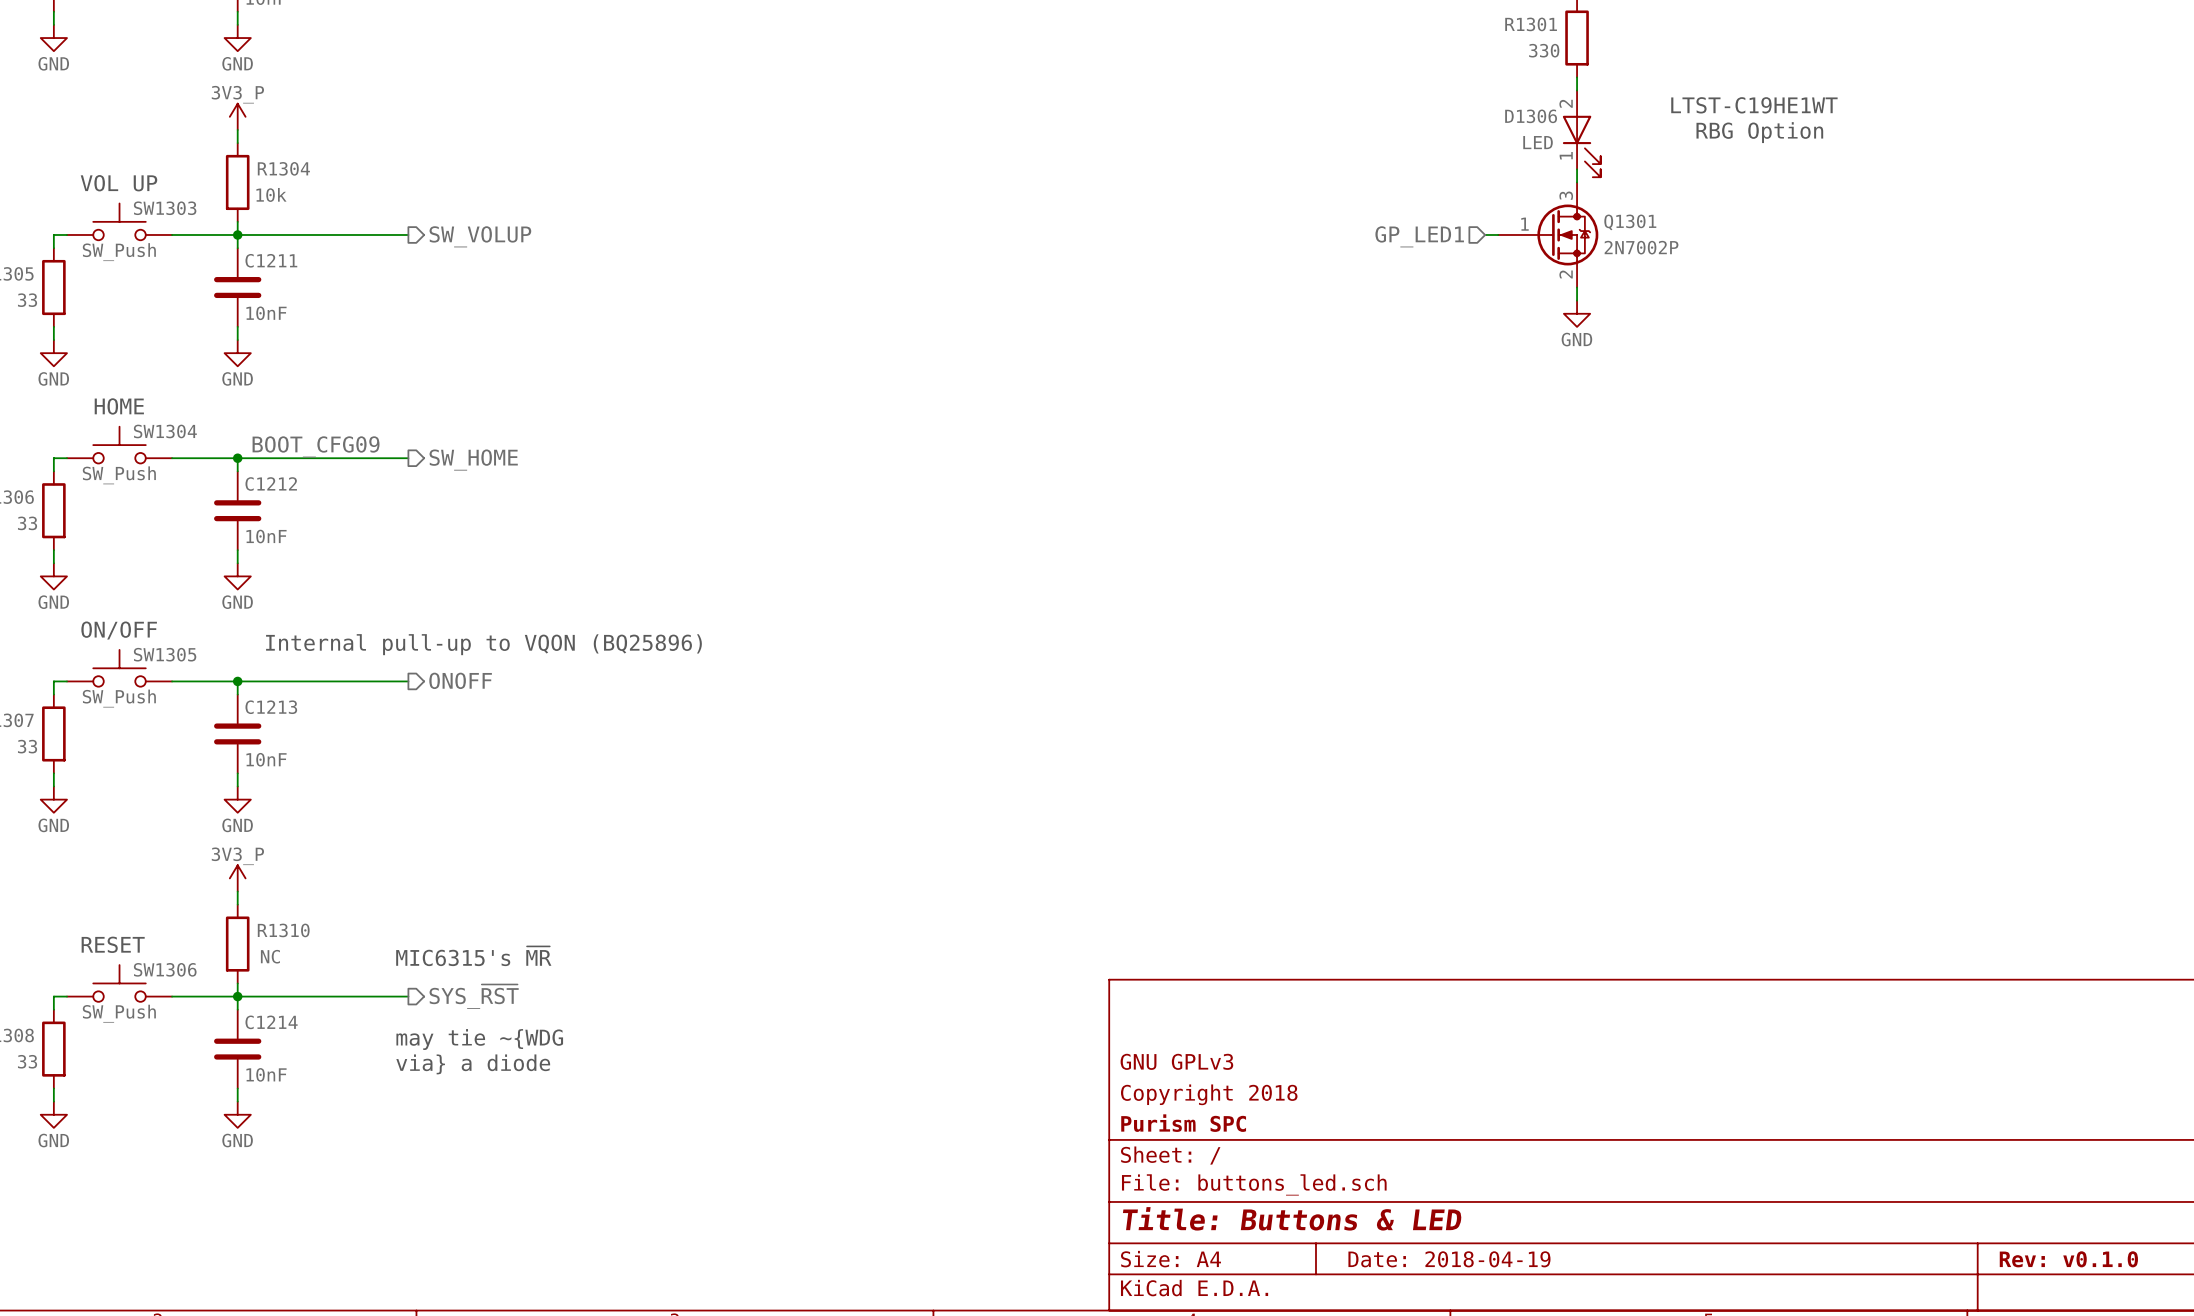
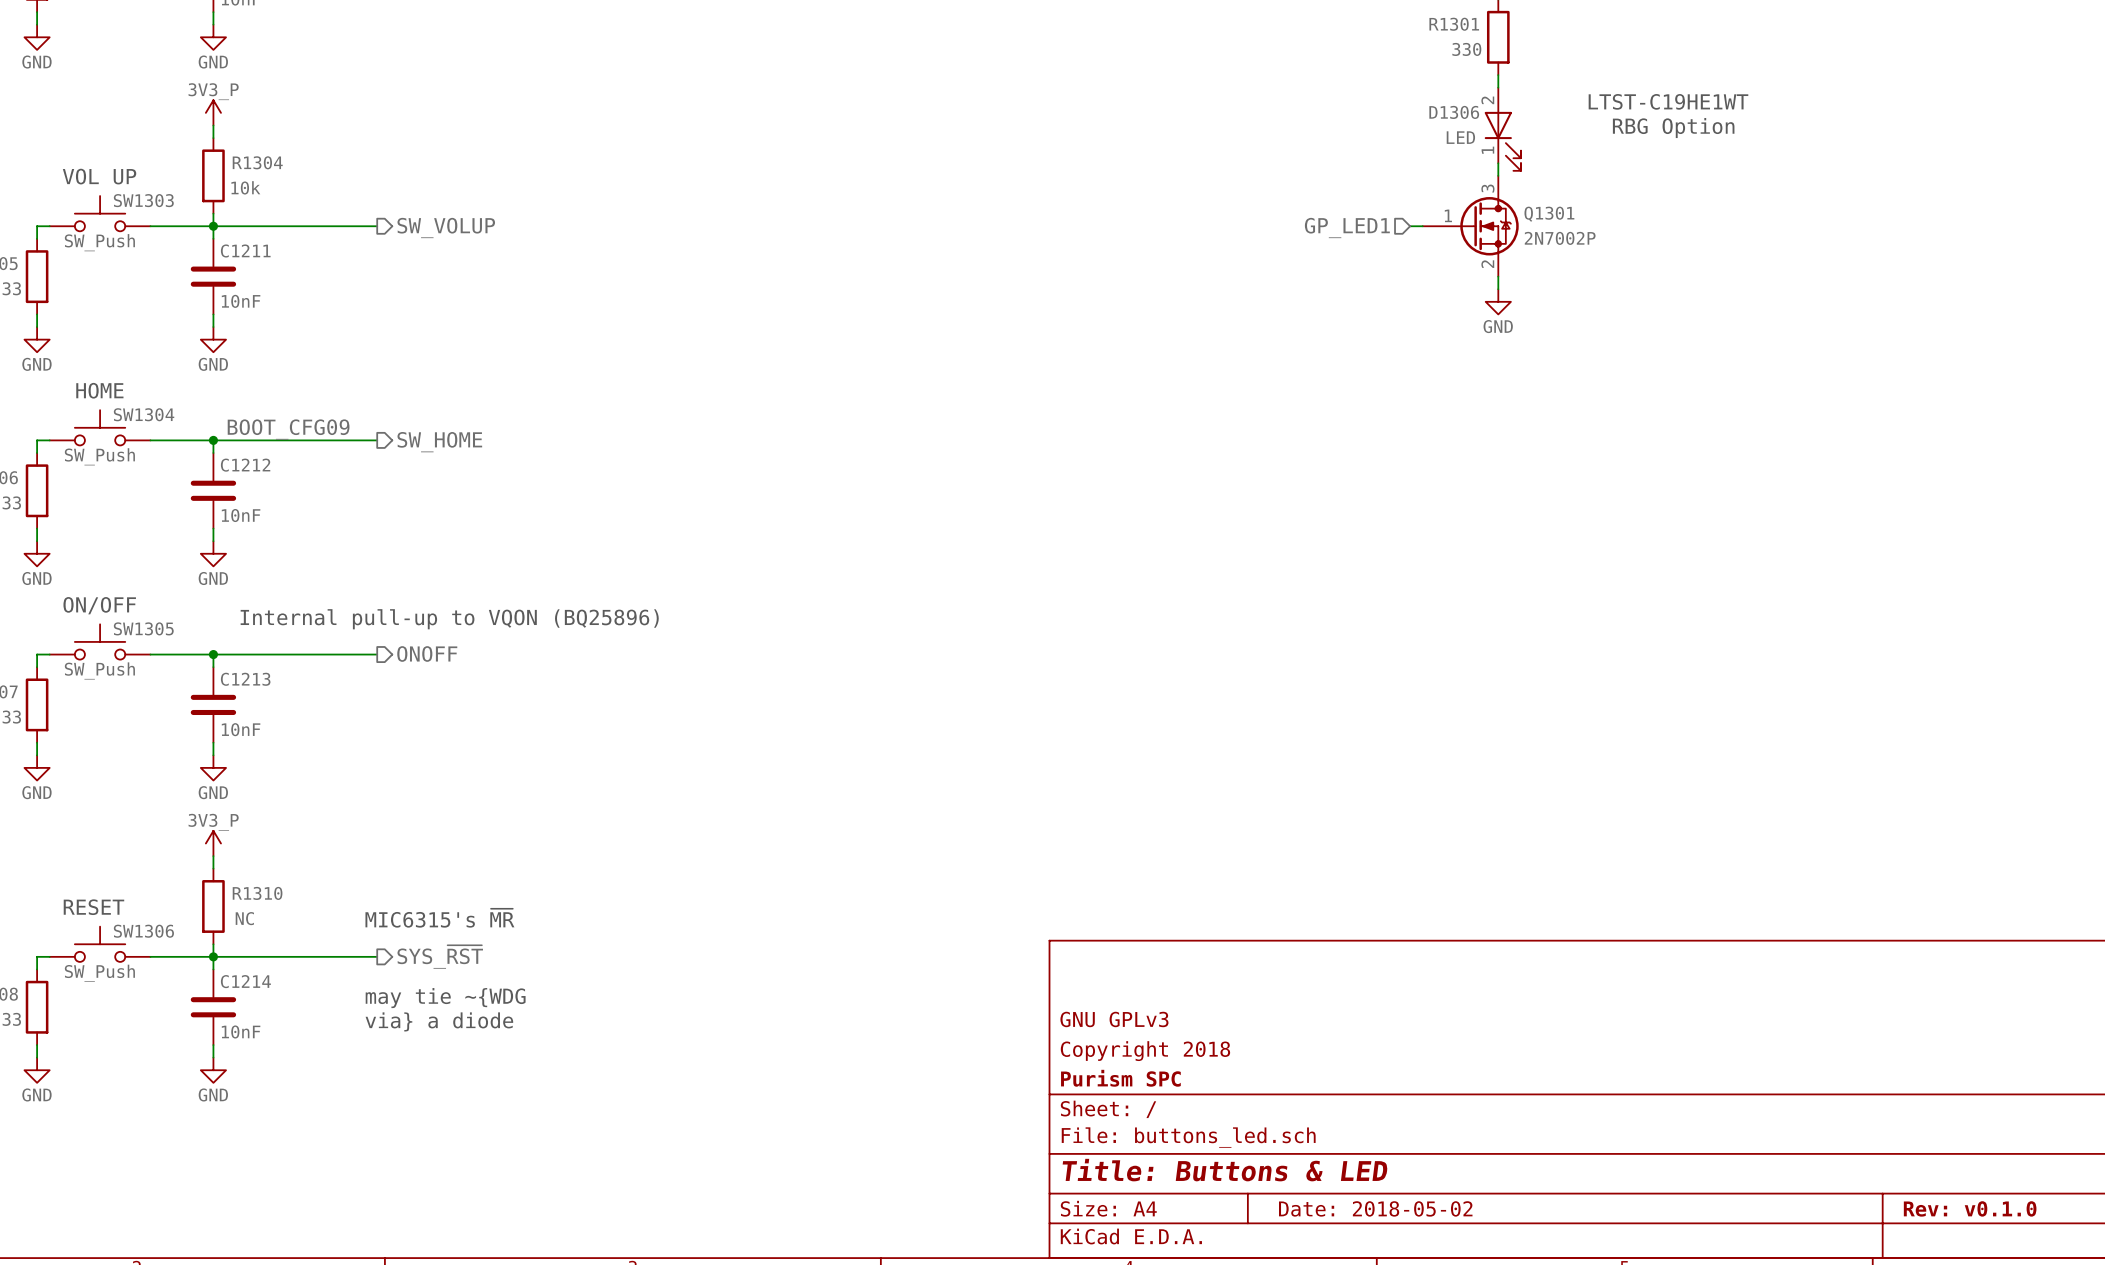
title block: Date: 2018-04-19 (1449, 1259) -> Date: 2018-05-02 (1375, 1208)

